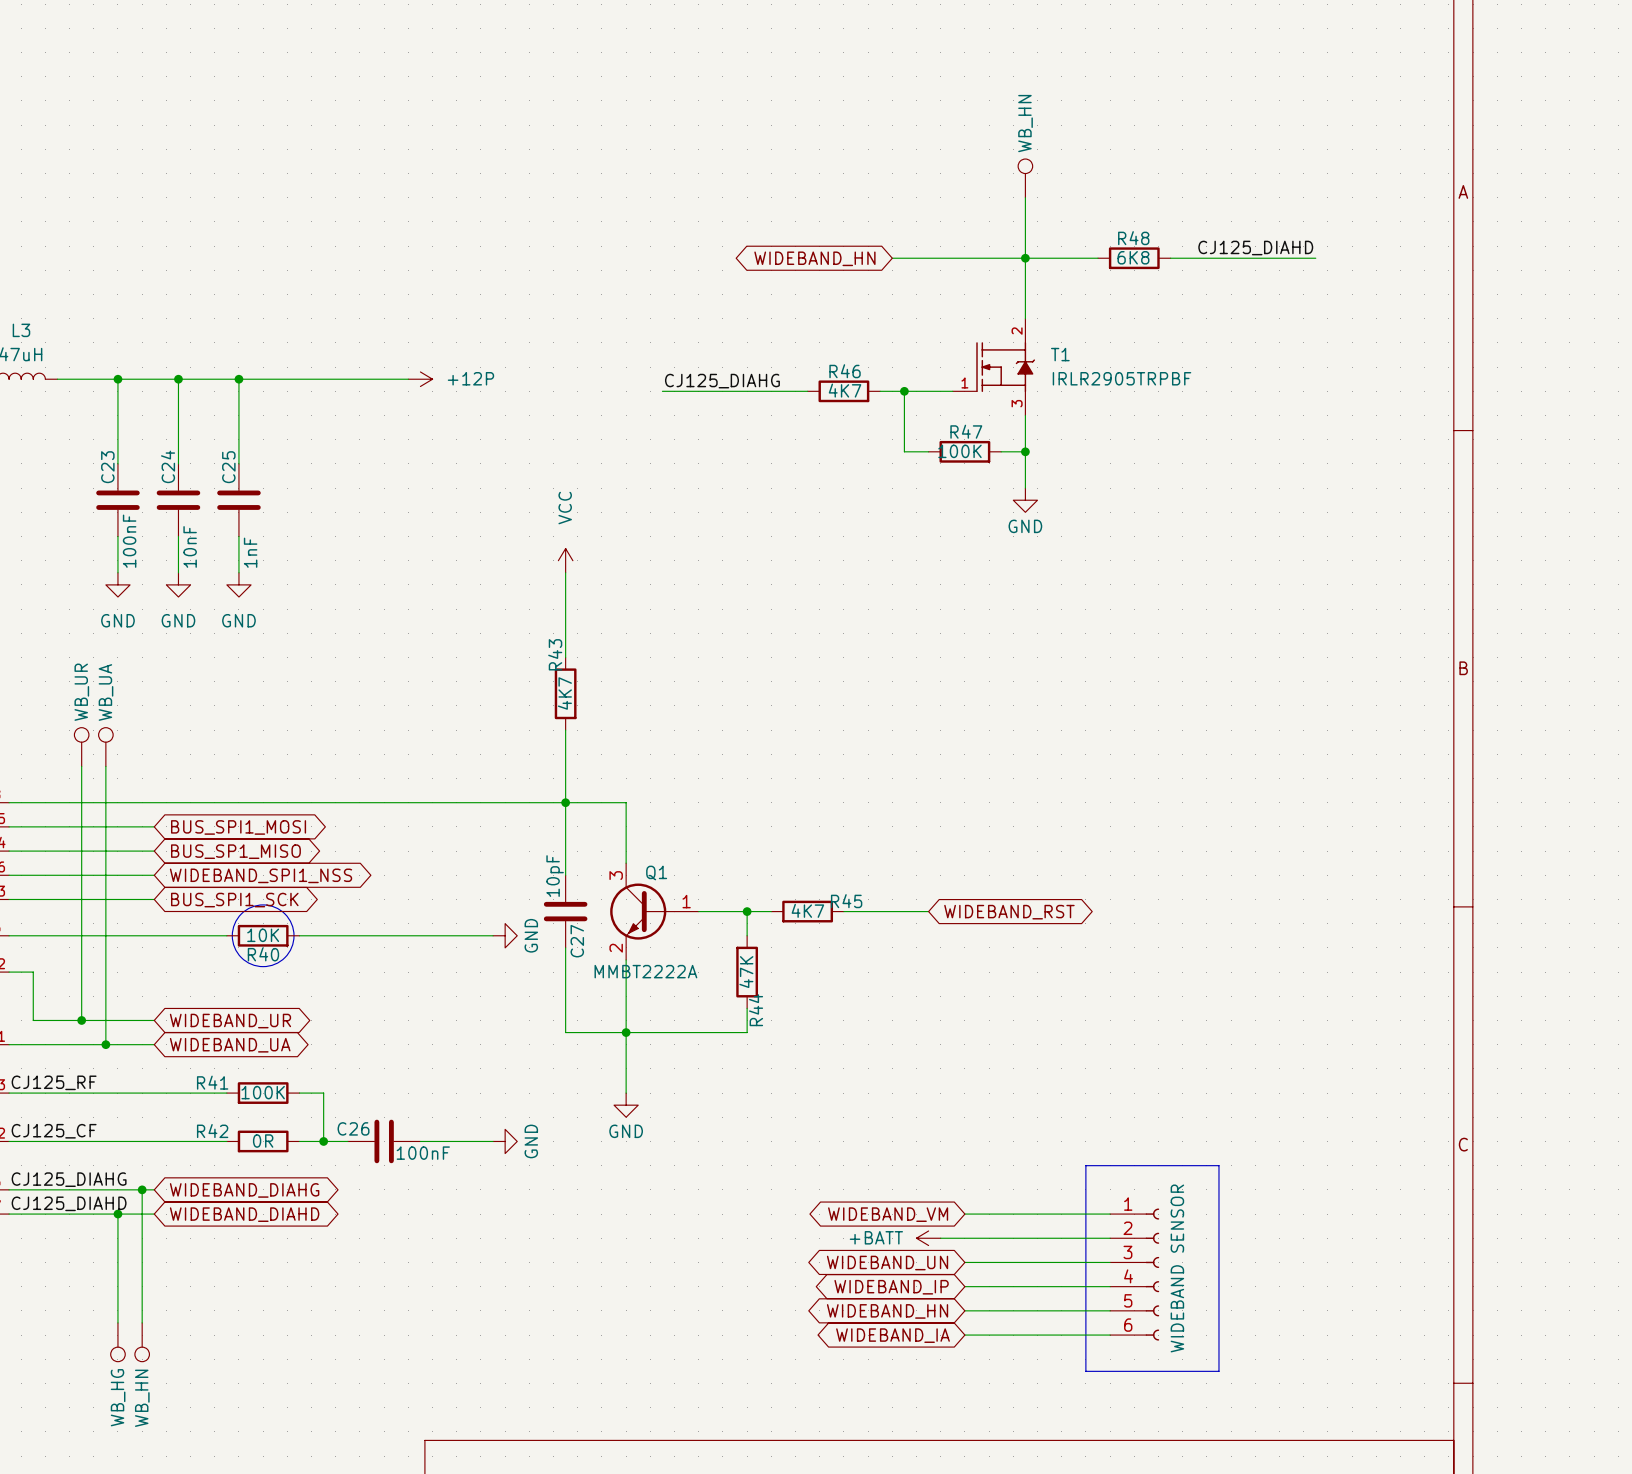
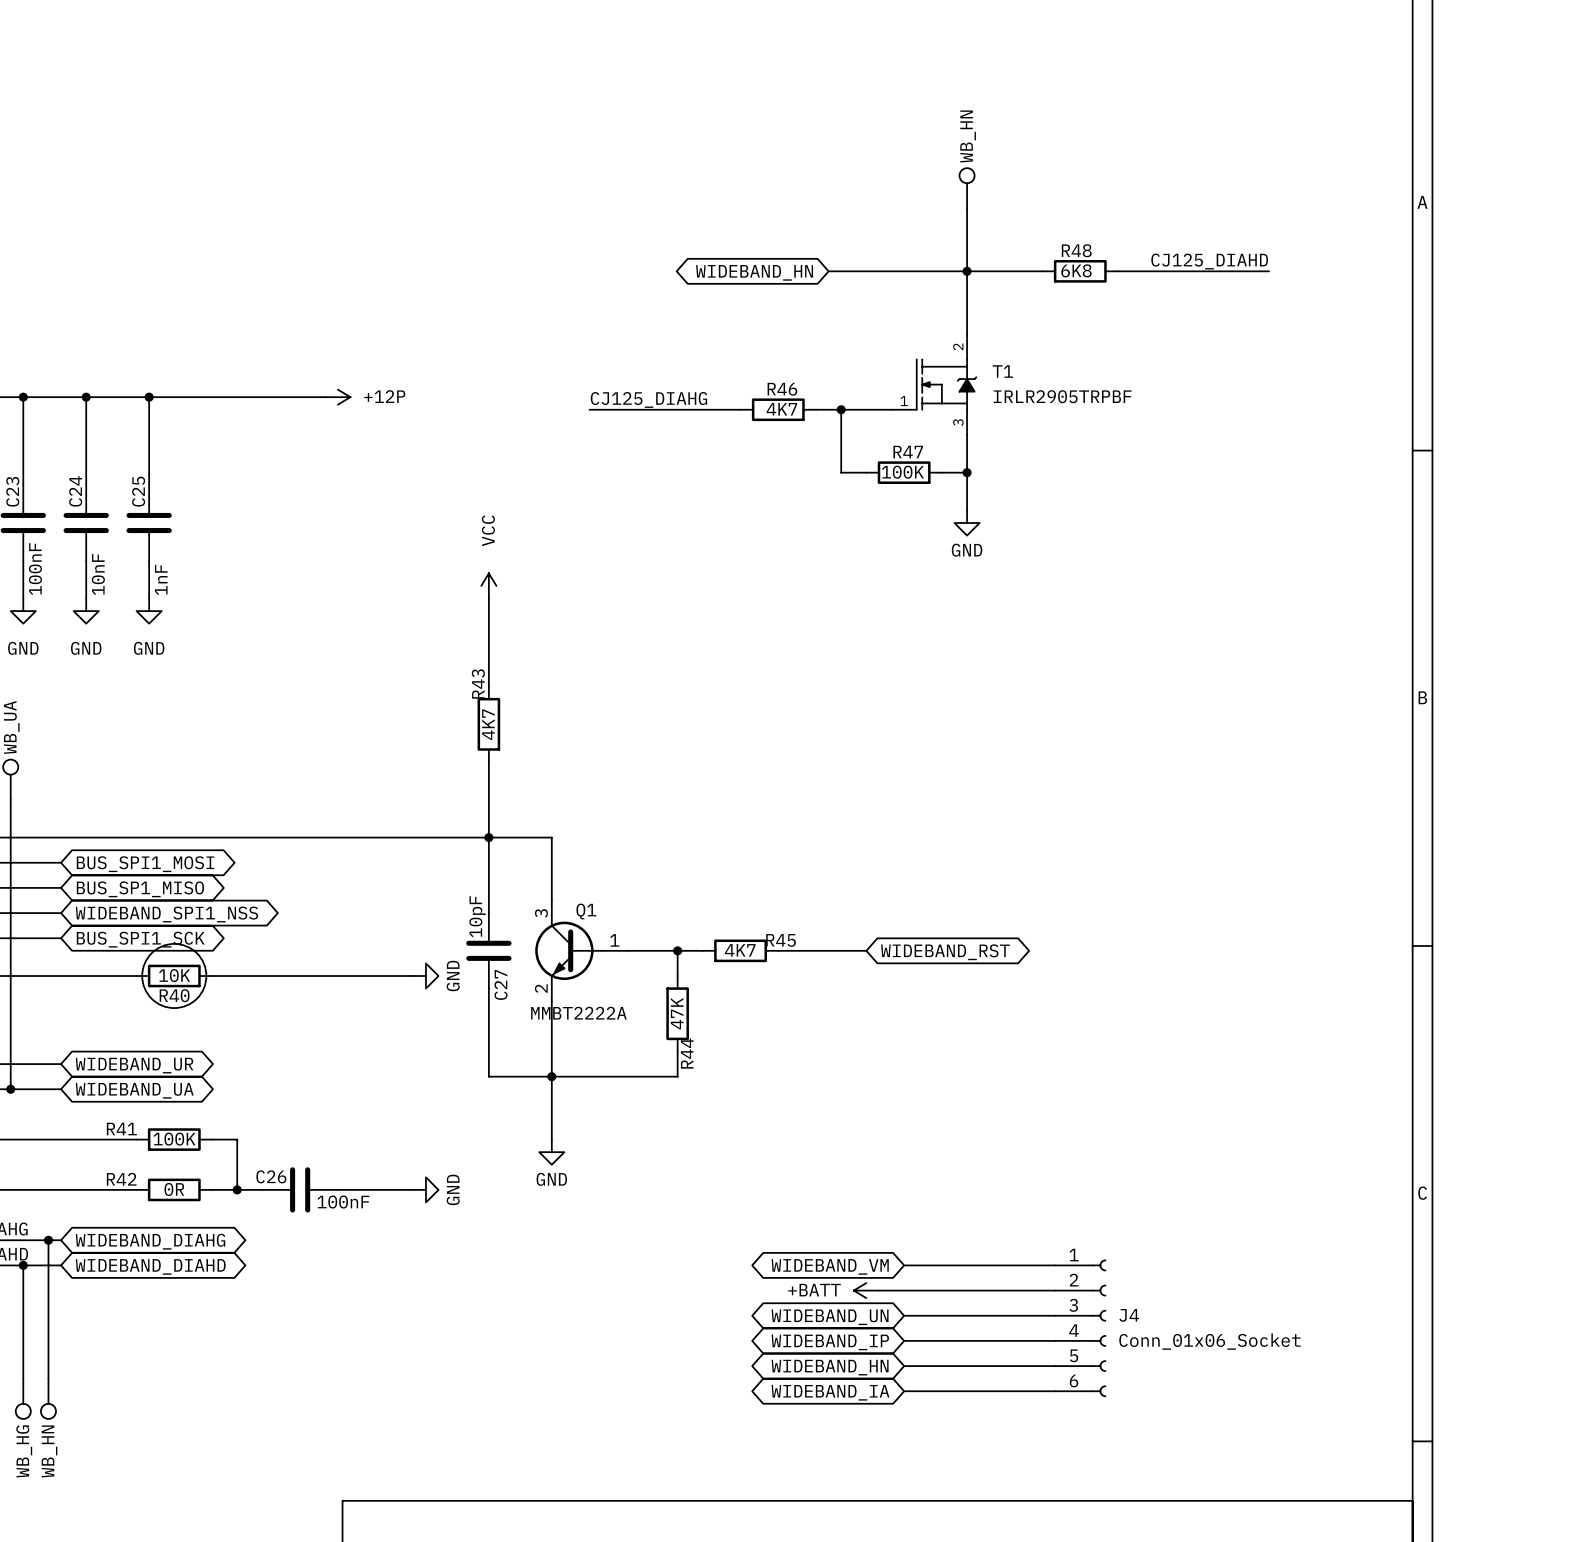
line: (1085, 1165) (1218, 1165) (1218, 1371) (1085, 1371) (1085, 1165) -> none
J4 name: none -> J4 (1129, 1315)
J4 value: WIDEBAND SENSOR (1177, 1268) -> Conn_01x06_Socket (1209, 1341)

